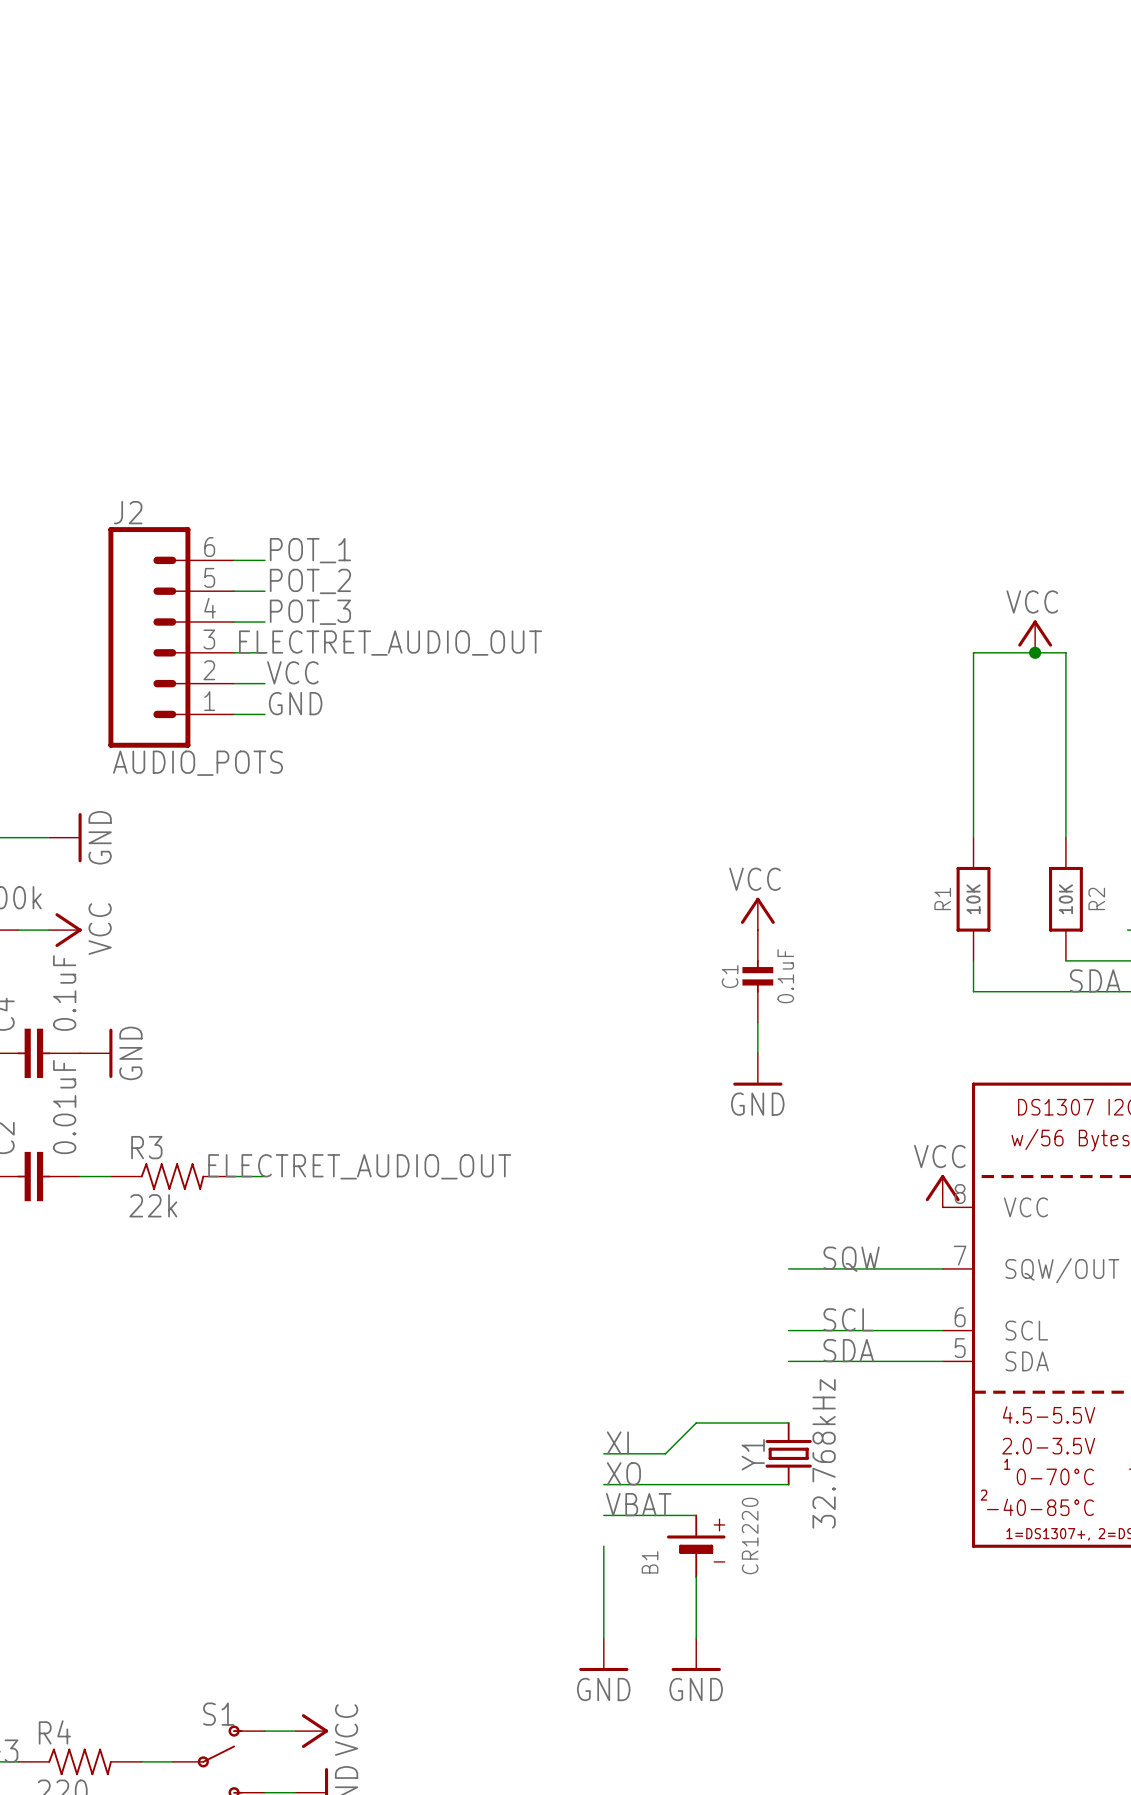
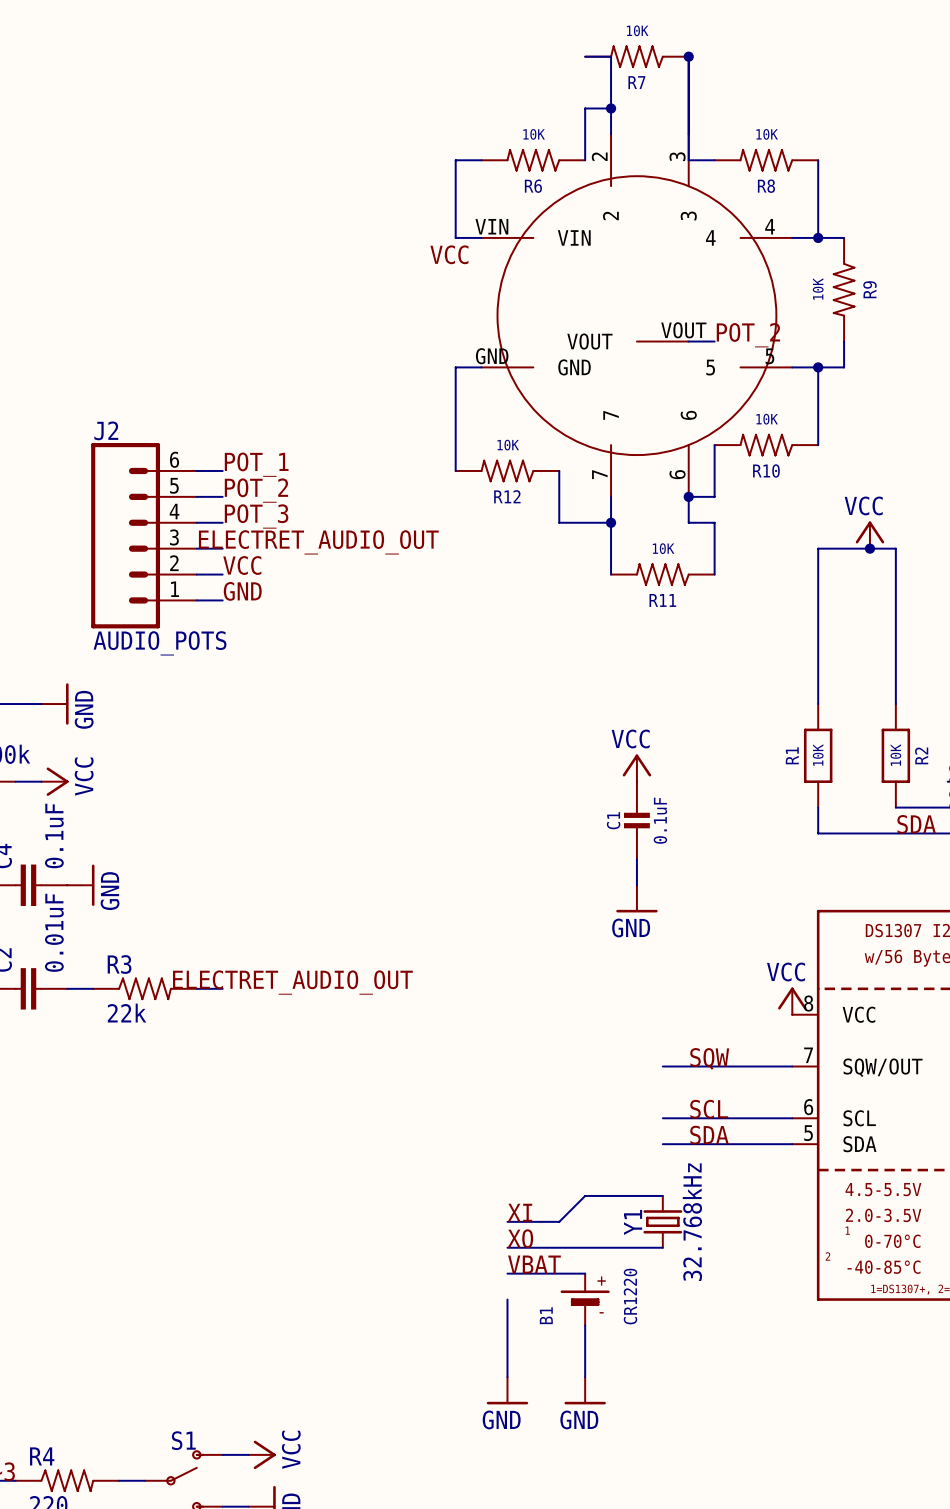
wire: none -> (585, 56) (611, 56) (611, 134)
R7: none -> 10K (636, 56)
wire: none -> (688, 56) (688, 160) (714, 160)
junction: none -> (688, 56)
wire: none -> (611, 108) (585, 108) (585, 160)
junction: none -> (611, 108)
wire: none -> (481, 160) (455, 160) (455, 237) (481, 237)
R6: none -> 10K (533, 160)
R8: none -> 10K (766, 160)
wire: none -> (818, 160) (818, 237)
wire: none -> (792, 237) (844, 237)
junction: none -> (818, 237)
label: none -> VCC (449, 254)
R9: none -> 10K (844, 289)
part: none -> (636, 315)
label: none -> POT_2 (748, 335)
wire: none -> (688, 341) (714, 341)
wire: none -> (844, 341) (844, 367) (792, 367)
wire: none -> (481, 367) (455, 367) (455, 470)
wire: none -> (818, 367) (818, 445)
junction: none -> (818, 367)
wire: none -> (714, 445) (714, 496) (688, 496) (688, 522) (714, 522) (714, 574)
R10: none -> 10K (766, 445)
R12: none -> 10K (507, 470)
wire: none -> (559, 470) (559, 522) (611, 522)
wire: none -> (611, 496) (611, 574)
junction: none -> (688, 496)
junction: none -> (611, 522)
R11: none -> 10K (662, 574)

